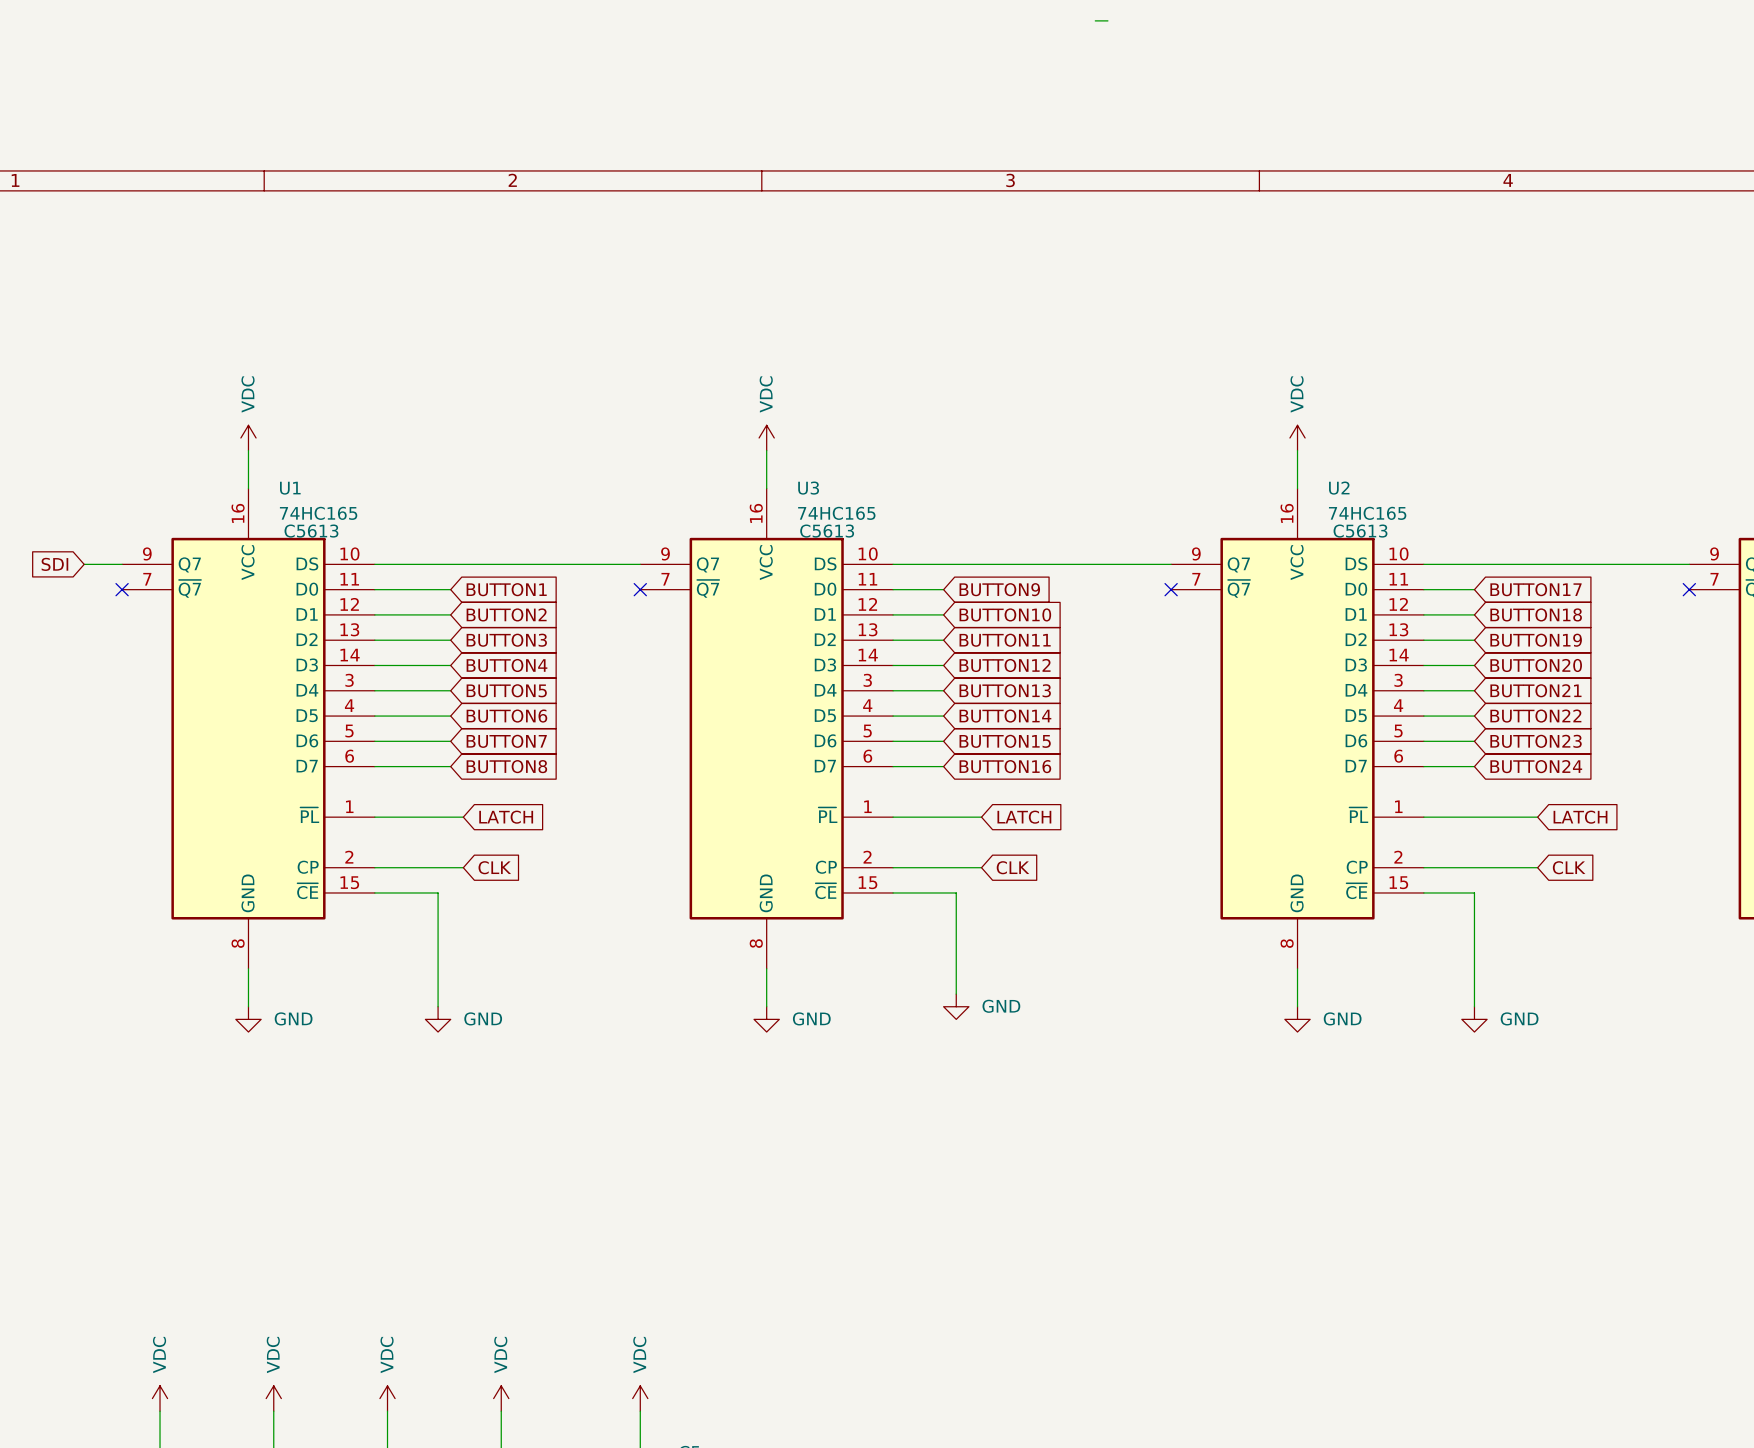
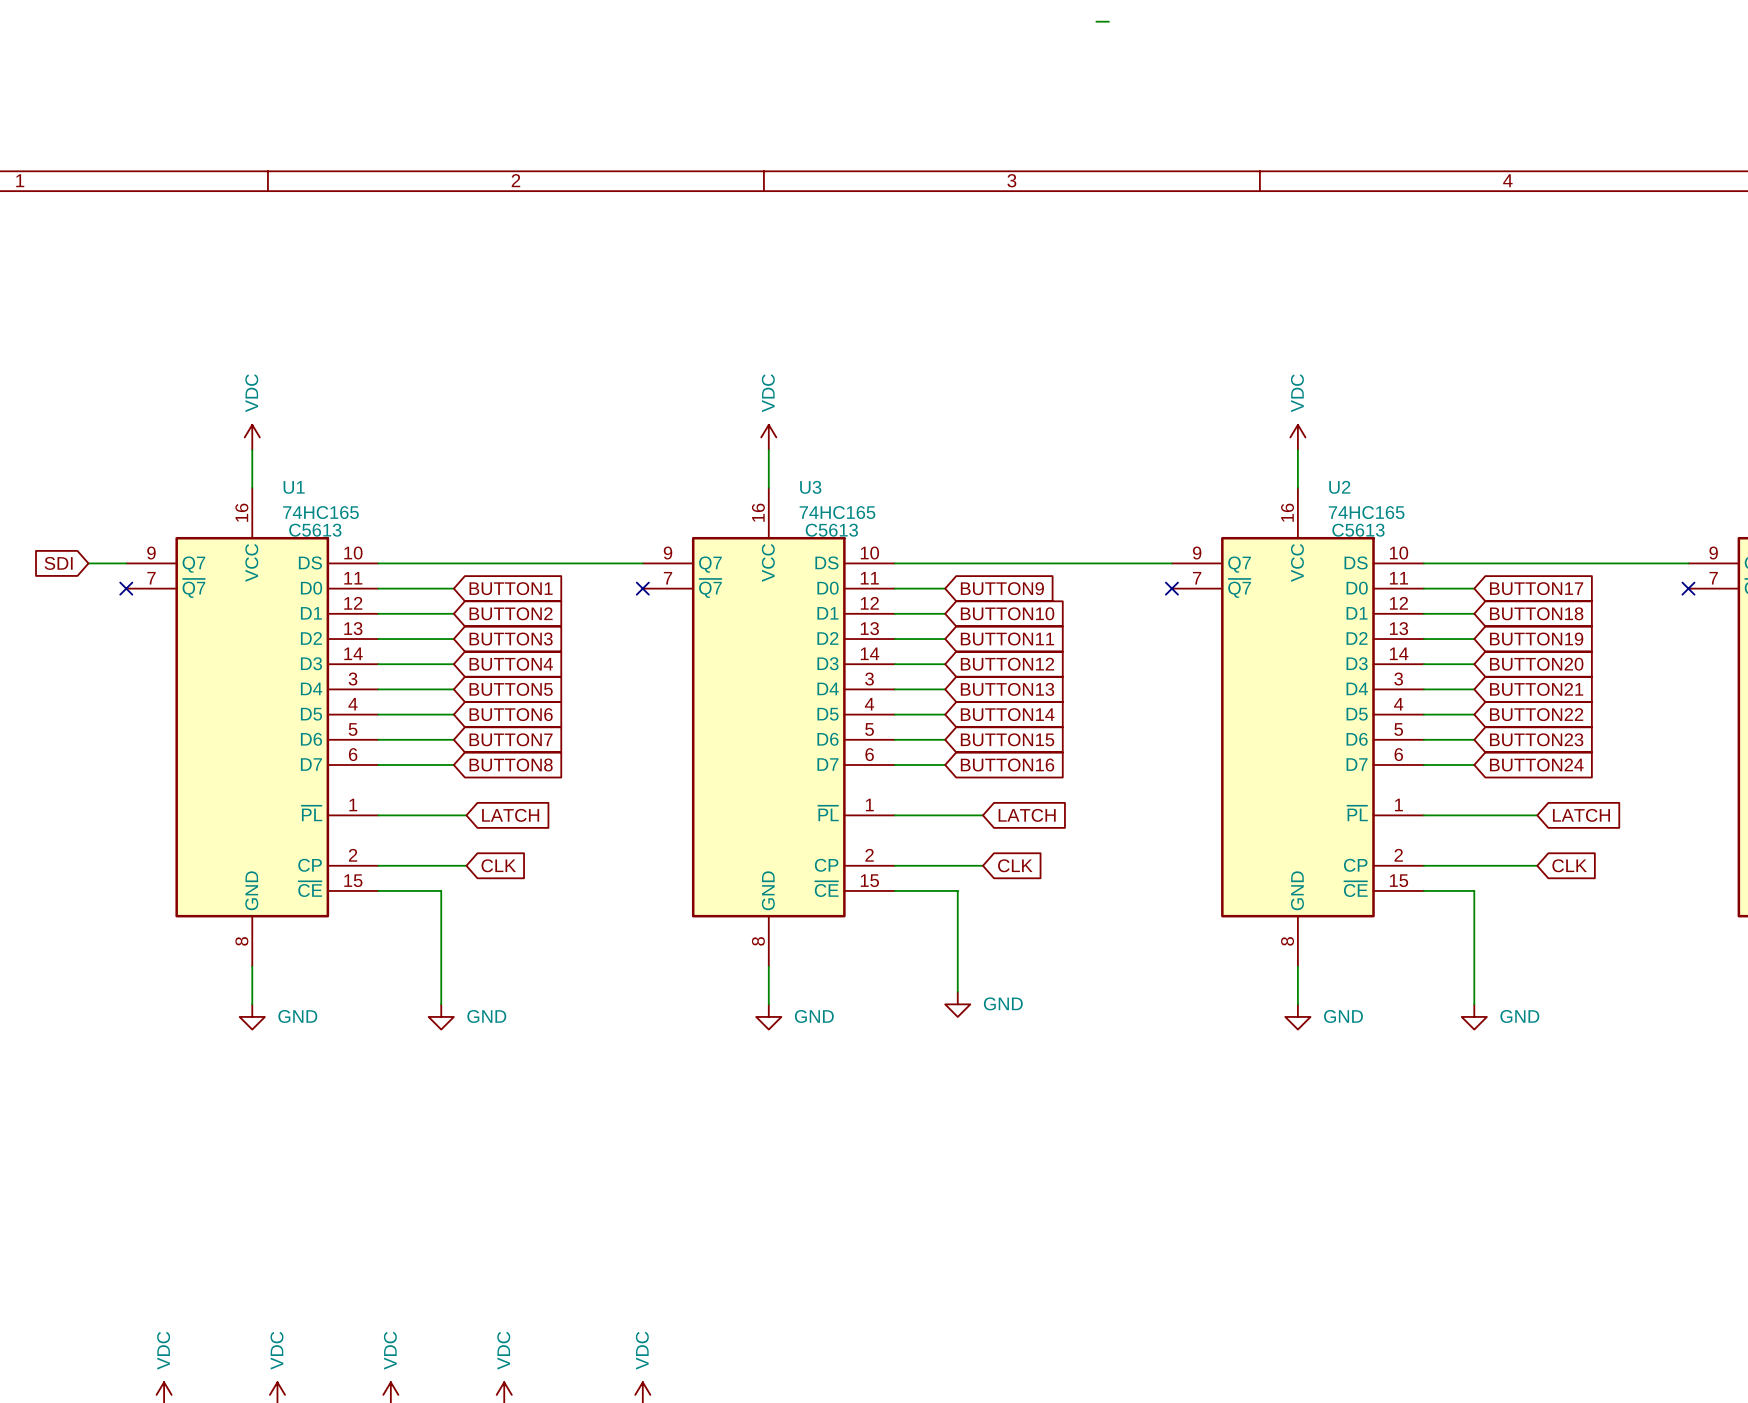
U3 text: C5613 (827, 531) -> none
U3 text: none -> C5613 (831, 530)
U2 text: none -> C5613 (1358, 530)
U2 text: C5613 (1360, 531) -> none

